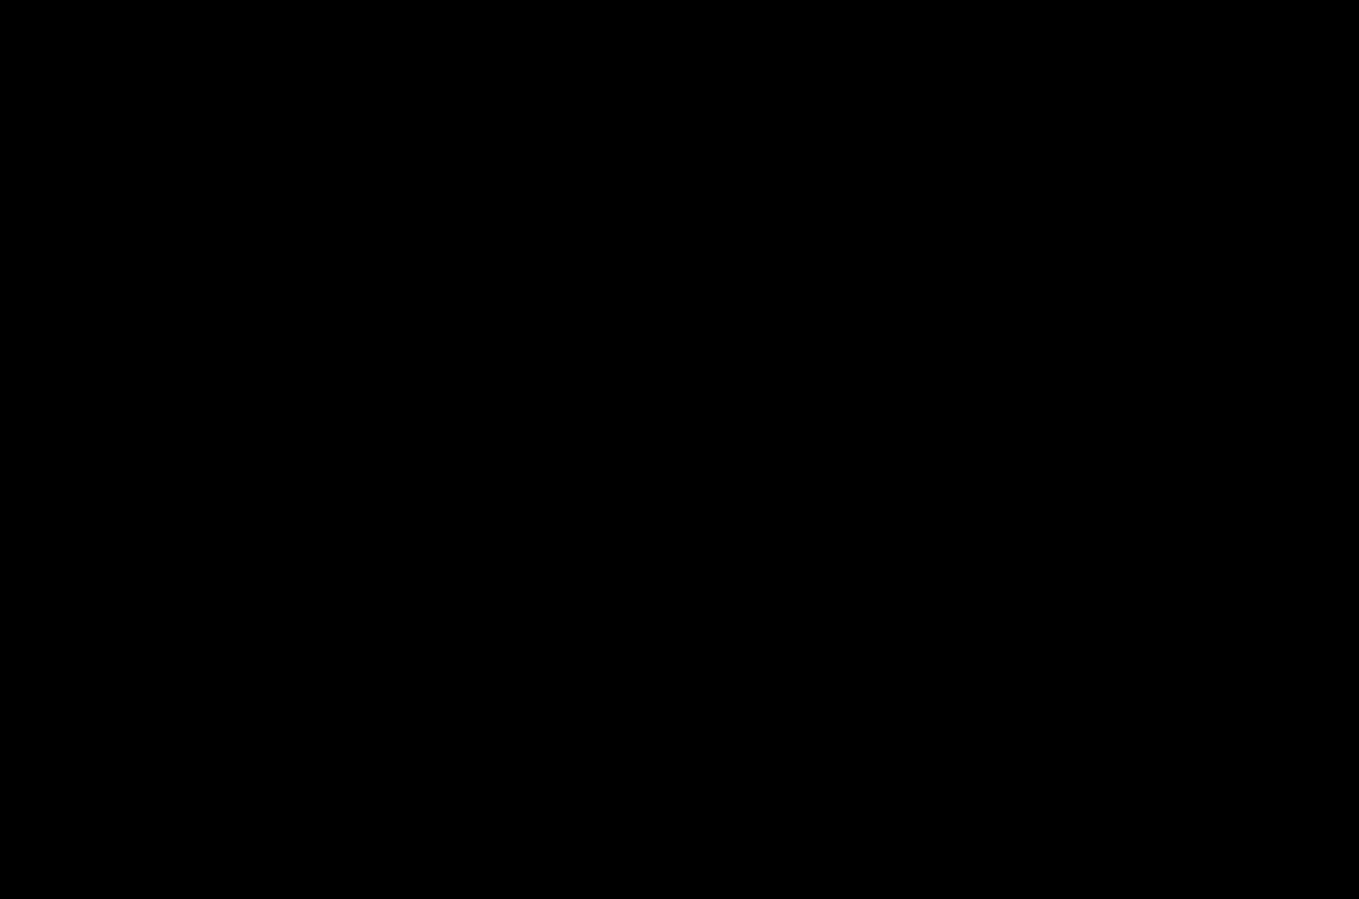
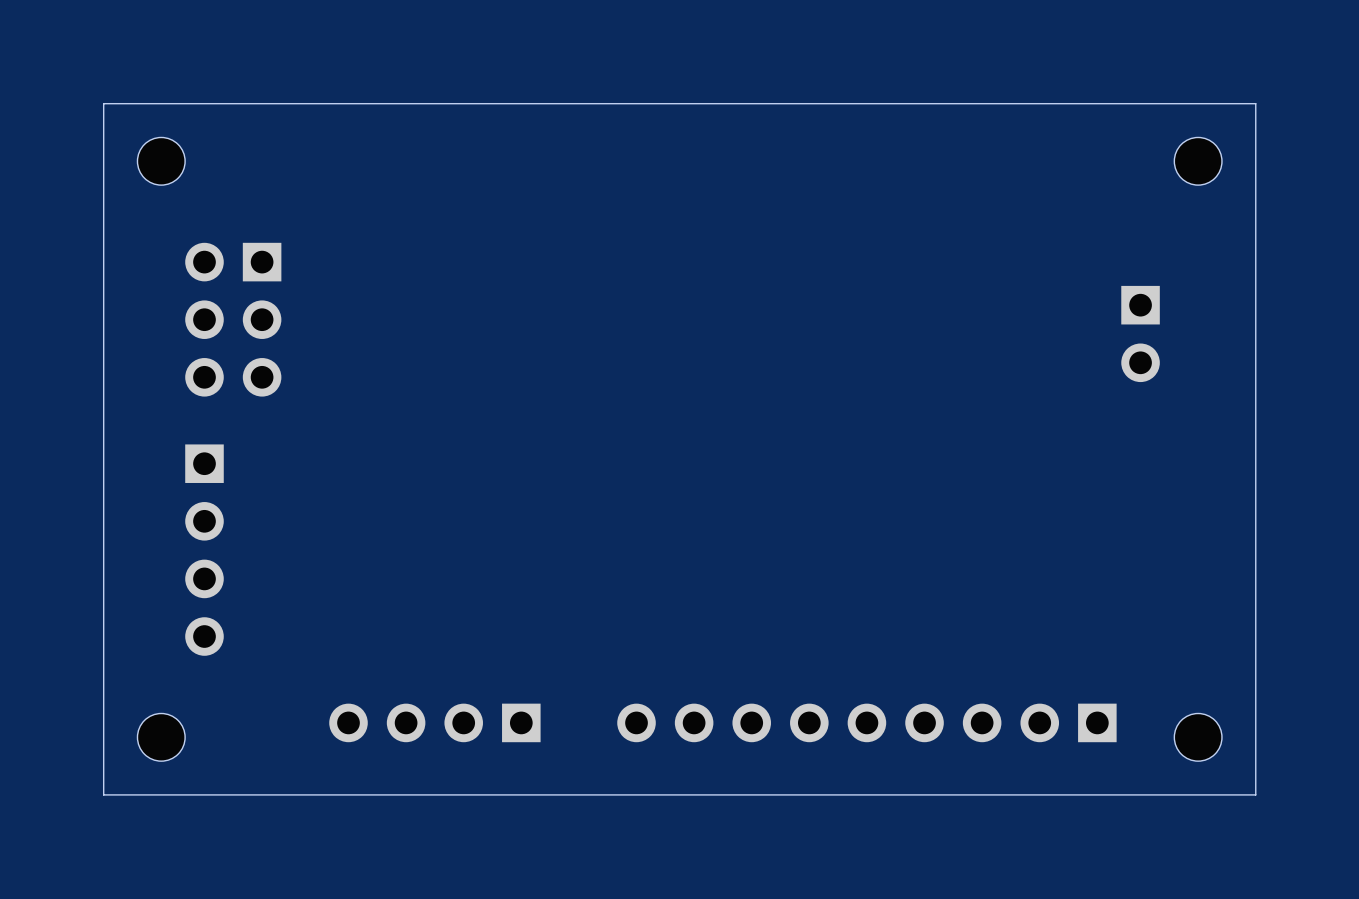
board edge: none -> (1255, 103) (103, 103) (103, 794) (1255, 794) (1255, 103)
part: none -> (161, 161)
part: none -> (1198, 161)
part: none -> (233, 319)
part: none -> (1140, 333)
part: none -> (204, 550)
part: none -> (434, 722)
part: none -> (866, 722)
part: none -> (161, 737)
part: none -> (1198, 737)

